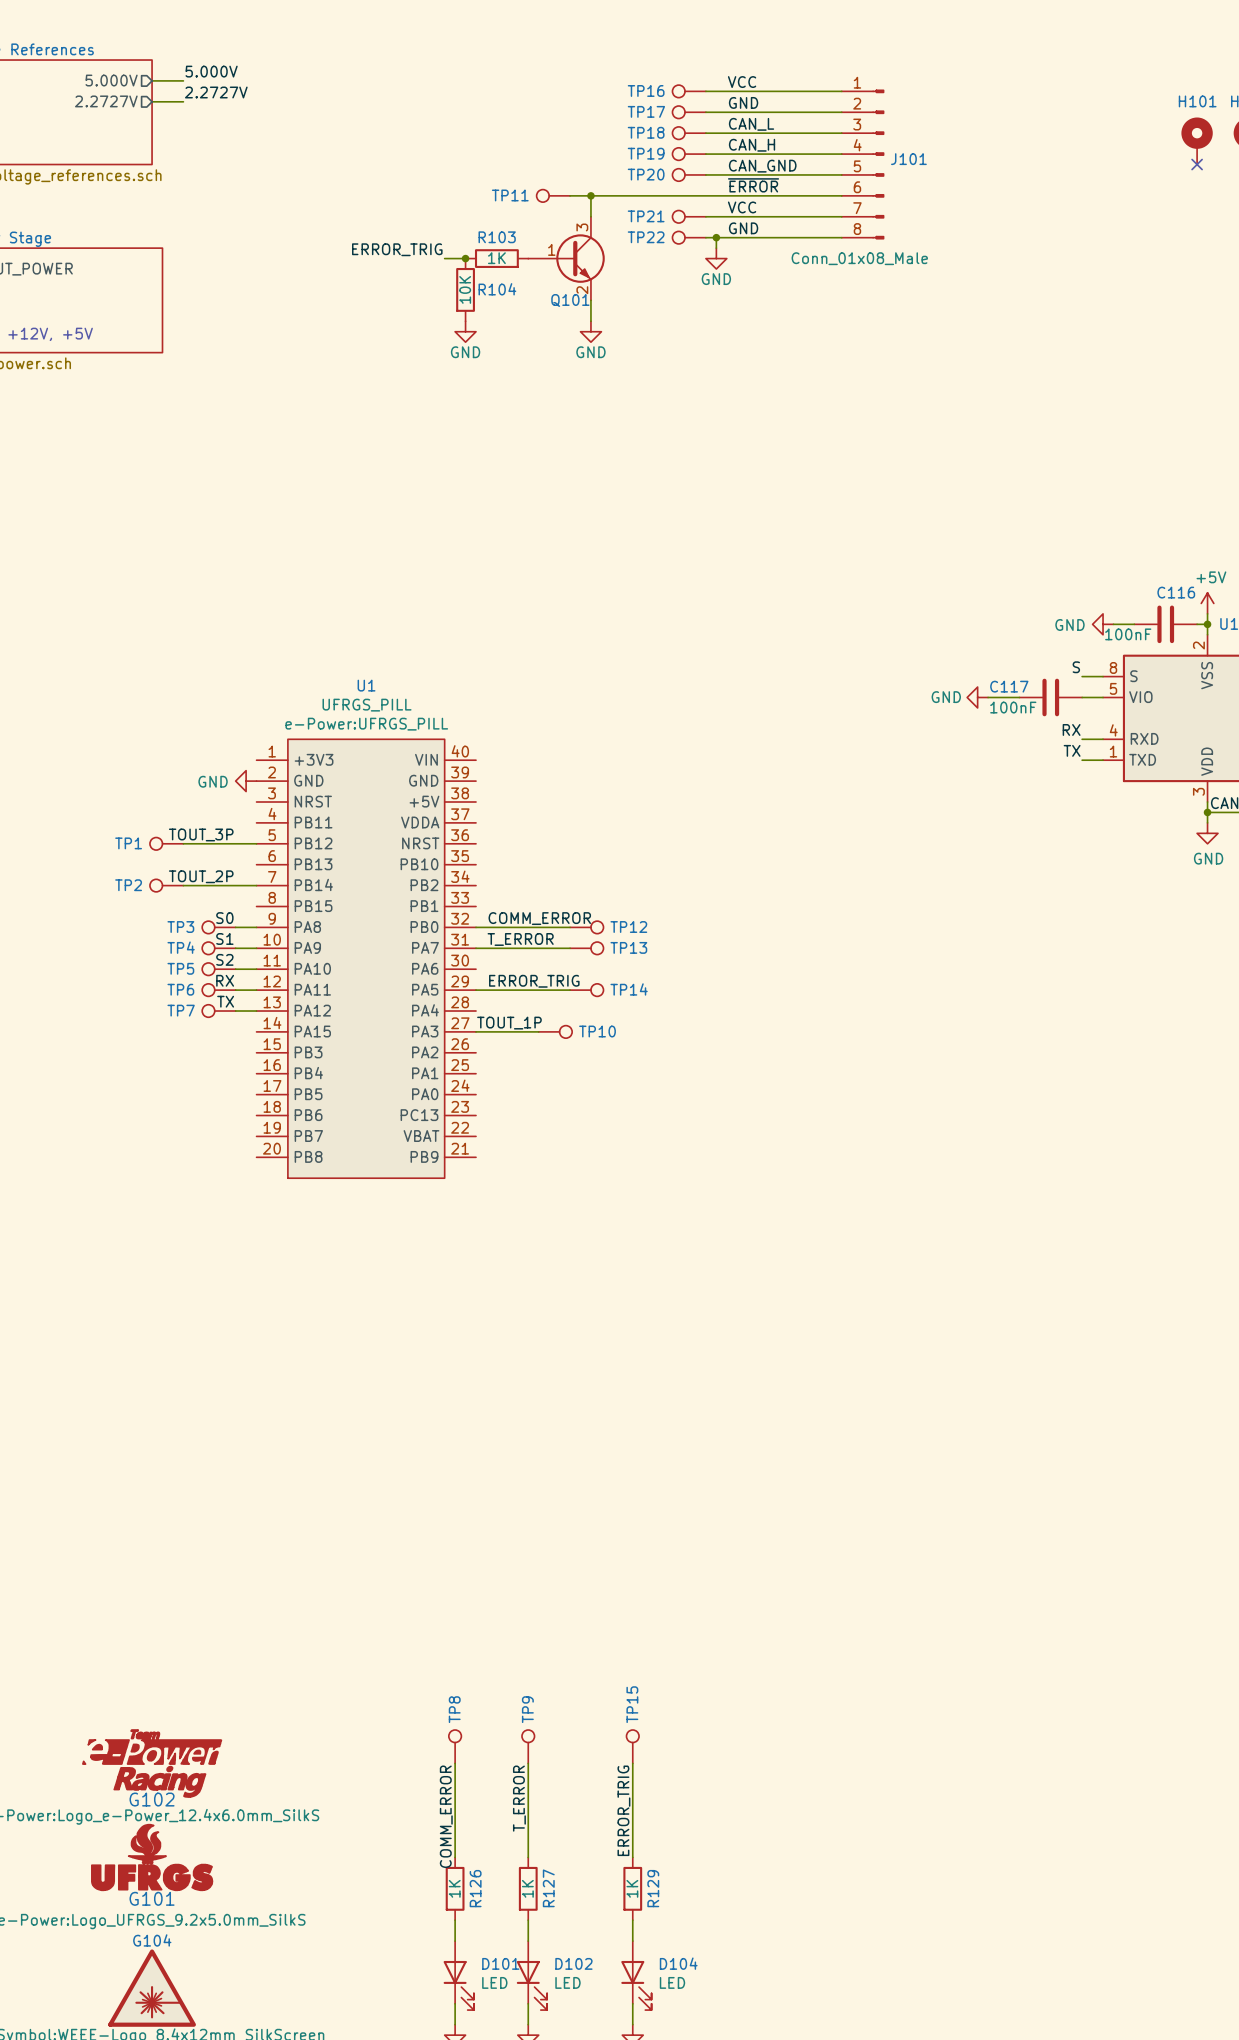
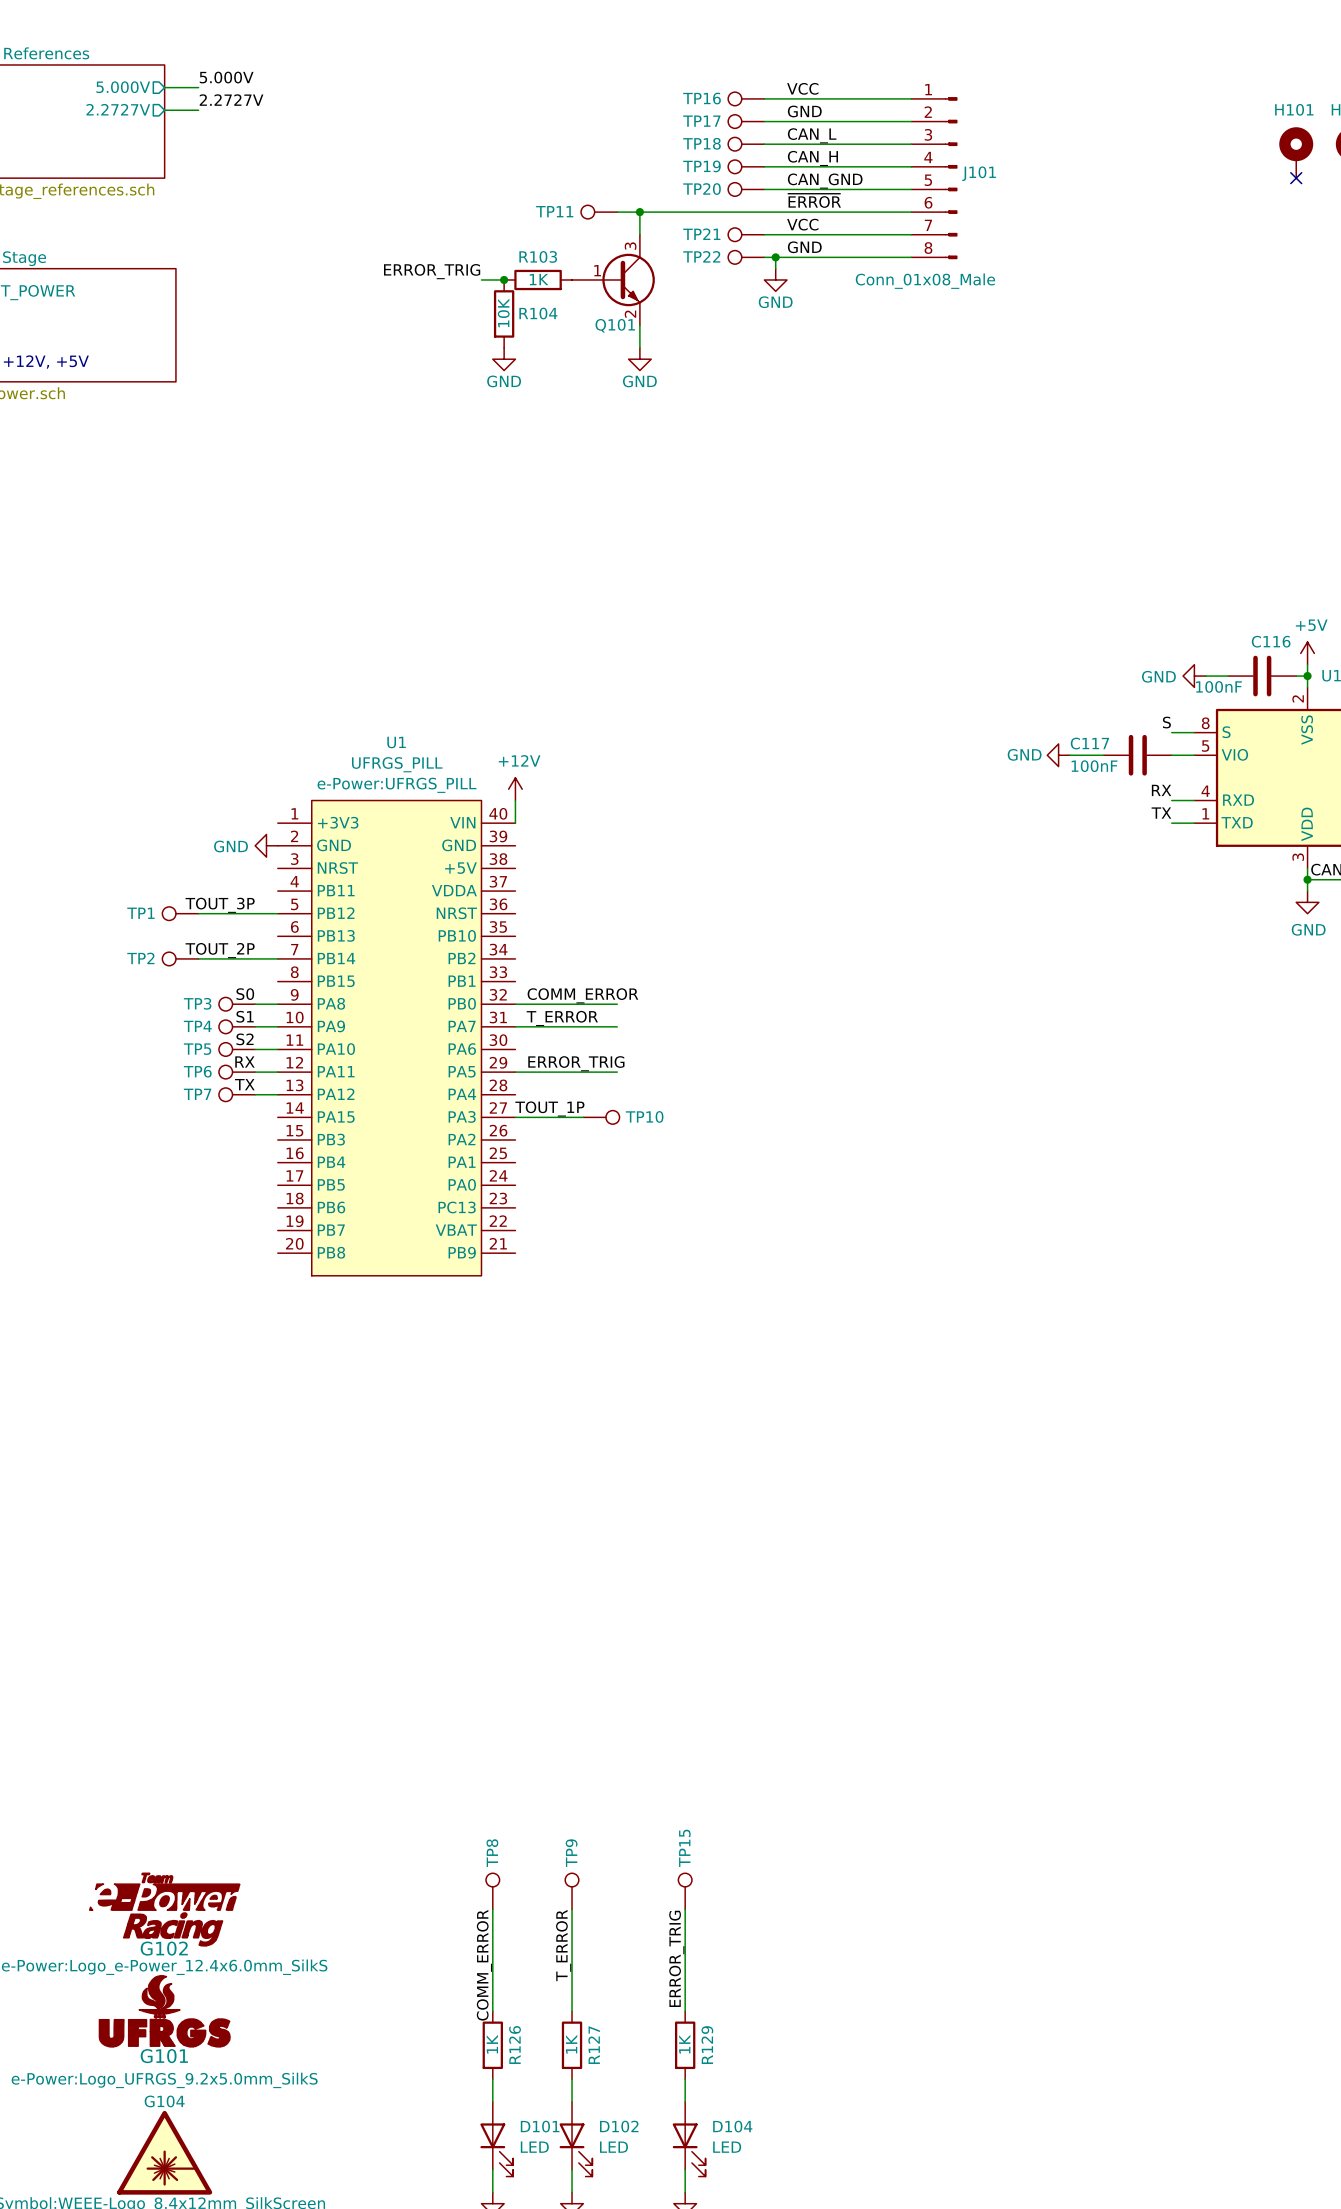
power symbol: none -> +12V (515, 789)
wire: none -> (515, 800) (515, 823)
TP12: (586, 927) -> none
TP13: (586, 948) -> none
TP14: (586, 990) -> none

